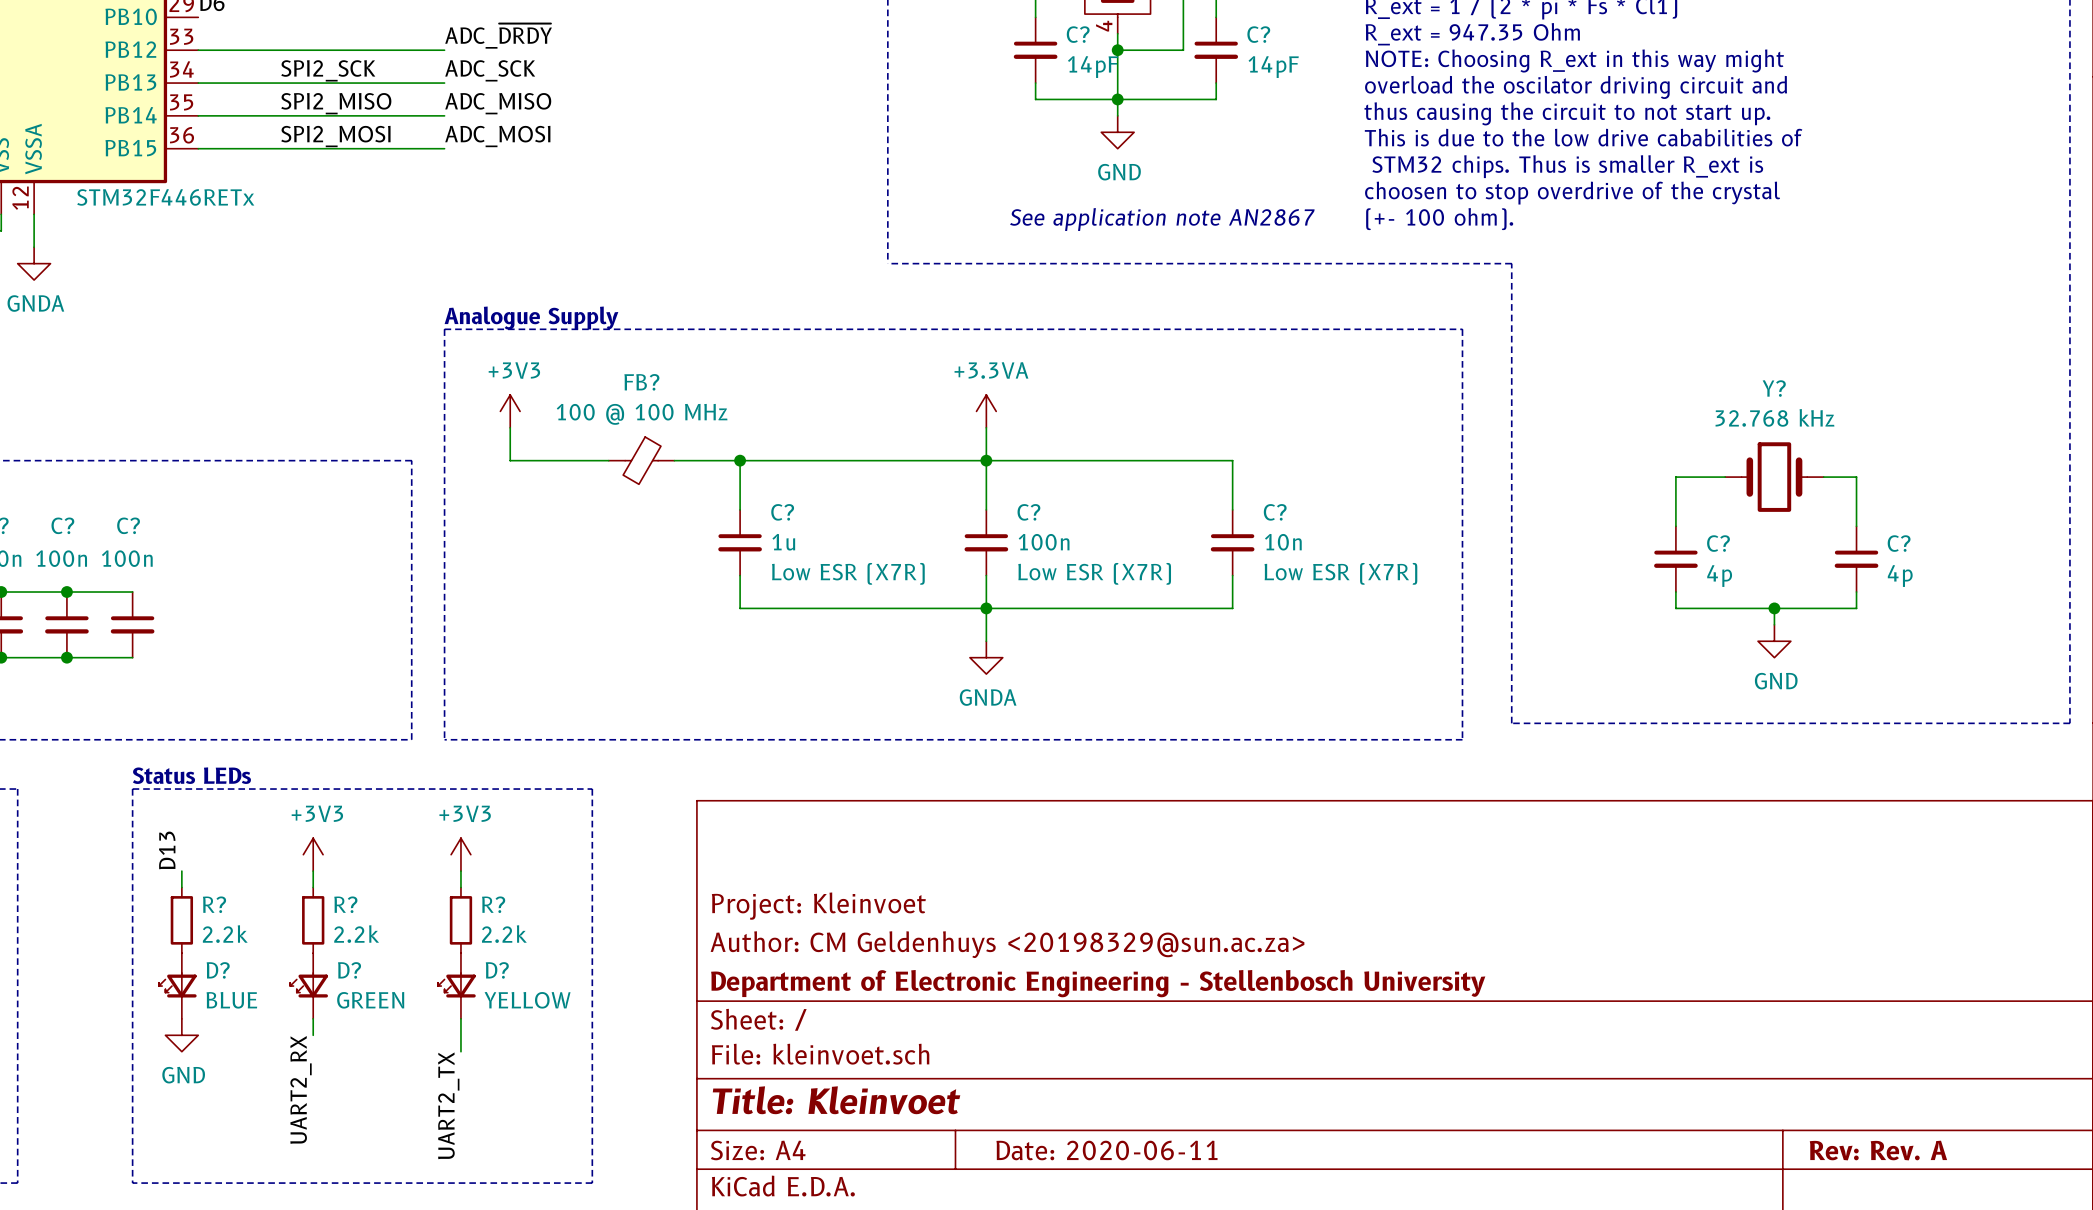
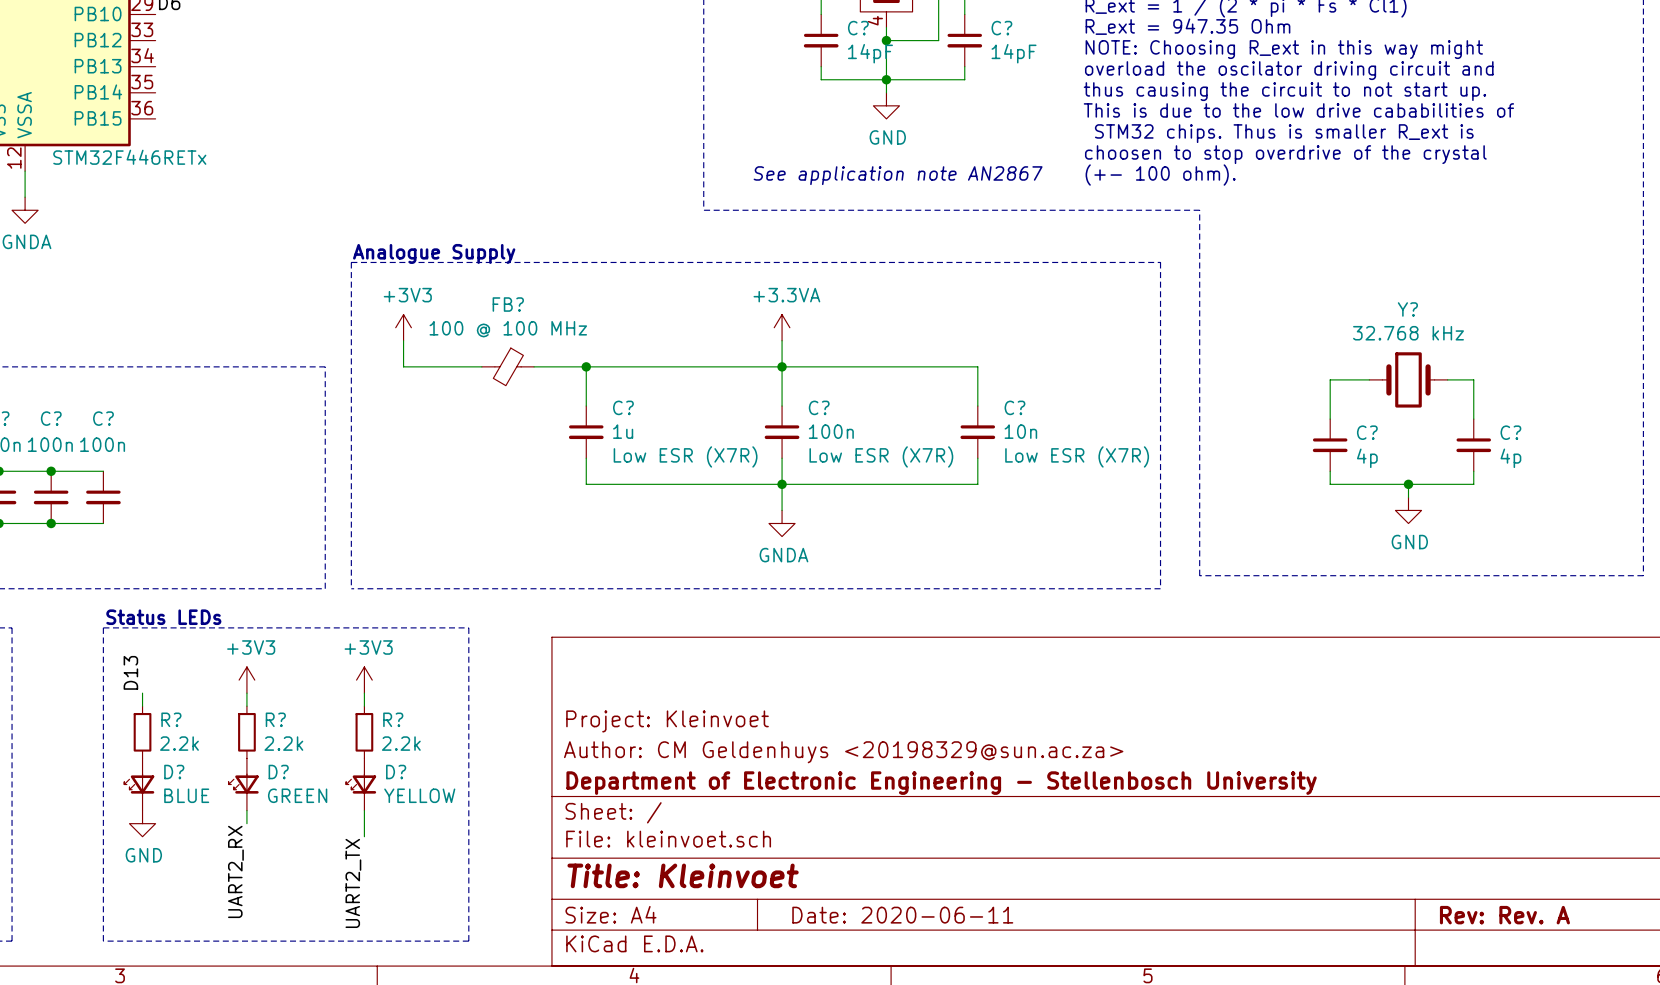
label: ADC_~{DRDY} (498, 36) -> none
wire: (198, 50) (444, 50) -> none
label: SPI2_SCK (328, 70) -> none
label: ADC_SCK (490, 70) -> none
wire: (198, 83) (444, 83) -> none
label: SPI2_MISO (336, 103) -> none
label: ADC_MISO (498, 103) -> none
wire: (198, 115) (444, 115) -> none
label: SPI2_MOSI (335, 136) -> none
label: ADC_MOSI (497, 136) -> none
wire: (198, 148) (444, 148) -> none

